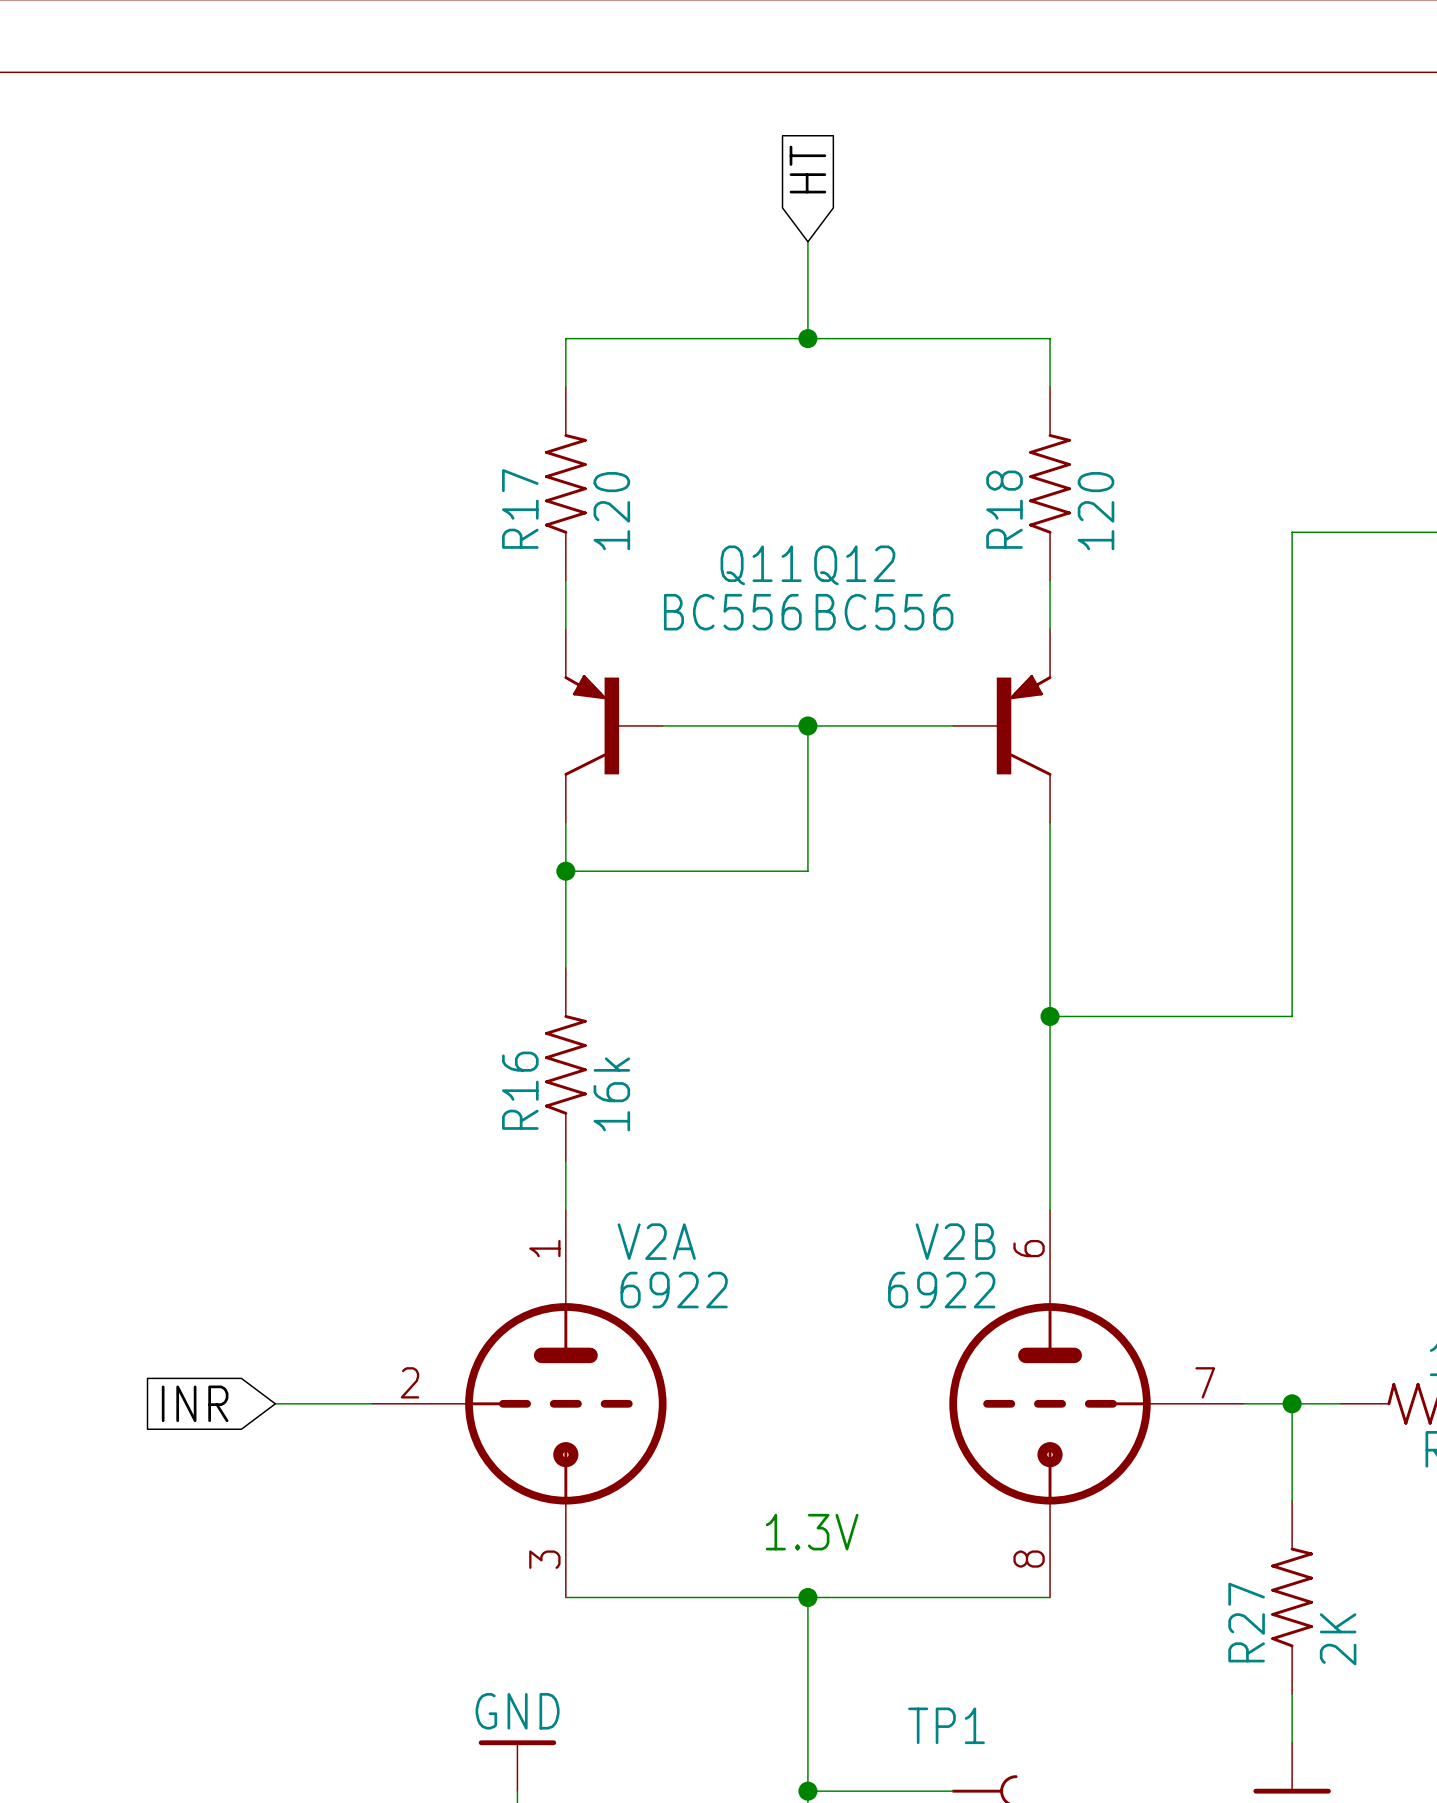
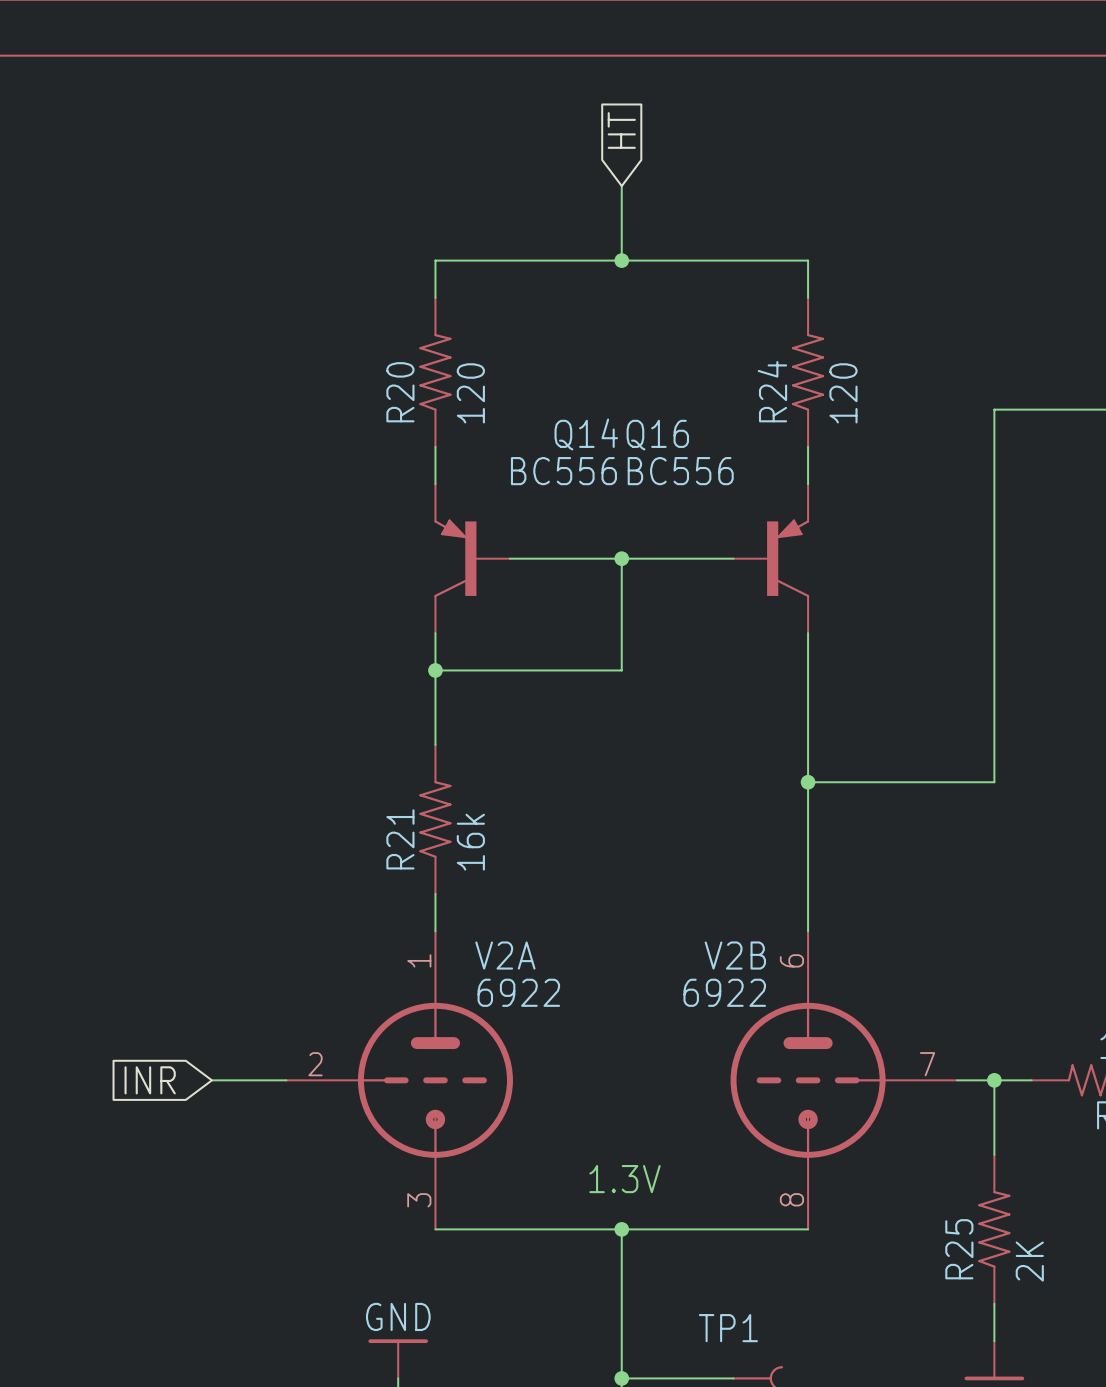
R17 name: R17 (520, 508) -> R20 (400, 392)
R18 name: R18 (1004, 509) -> R24 (772, 391)
Q11 name: Q11 (761, 565) -> Q14 (586, 434)
Q12 name: Q12 (854, 565) -> Q16 (657, 435)
R16 name: R16 (520, 1090) -> R21 (400, 839)
R27 name: R27 (1246, 1622) -> R25 (959, 1249)

